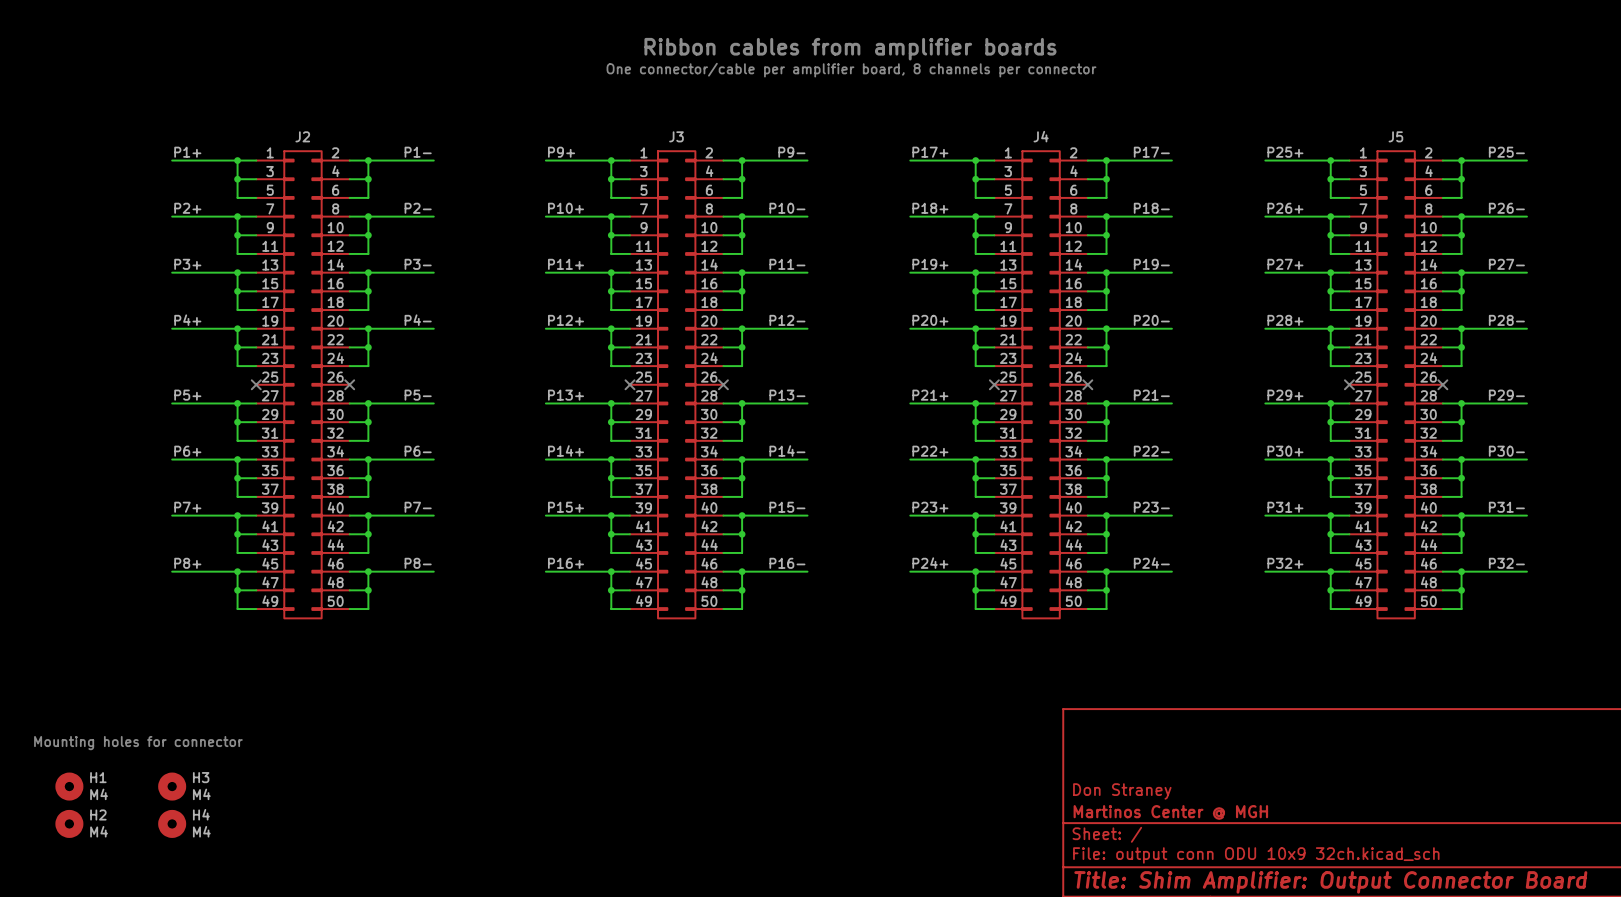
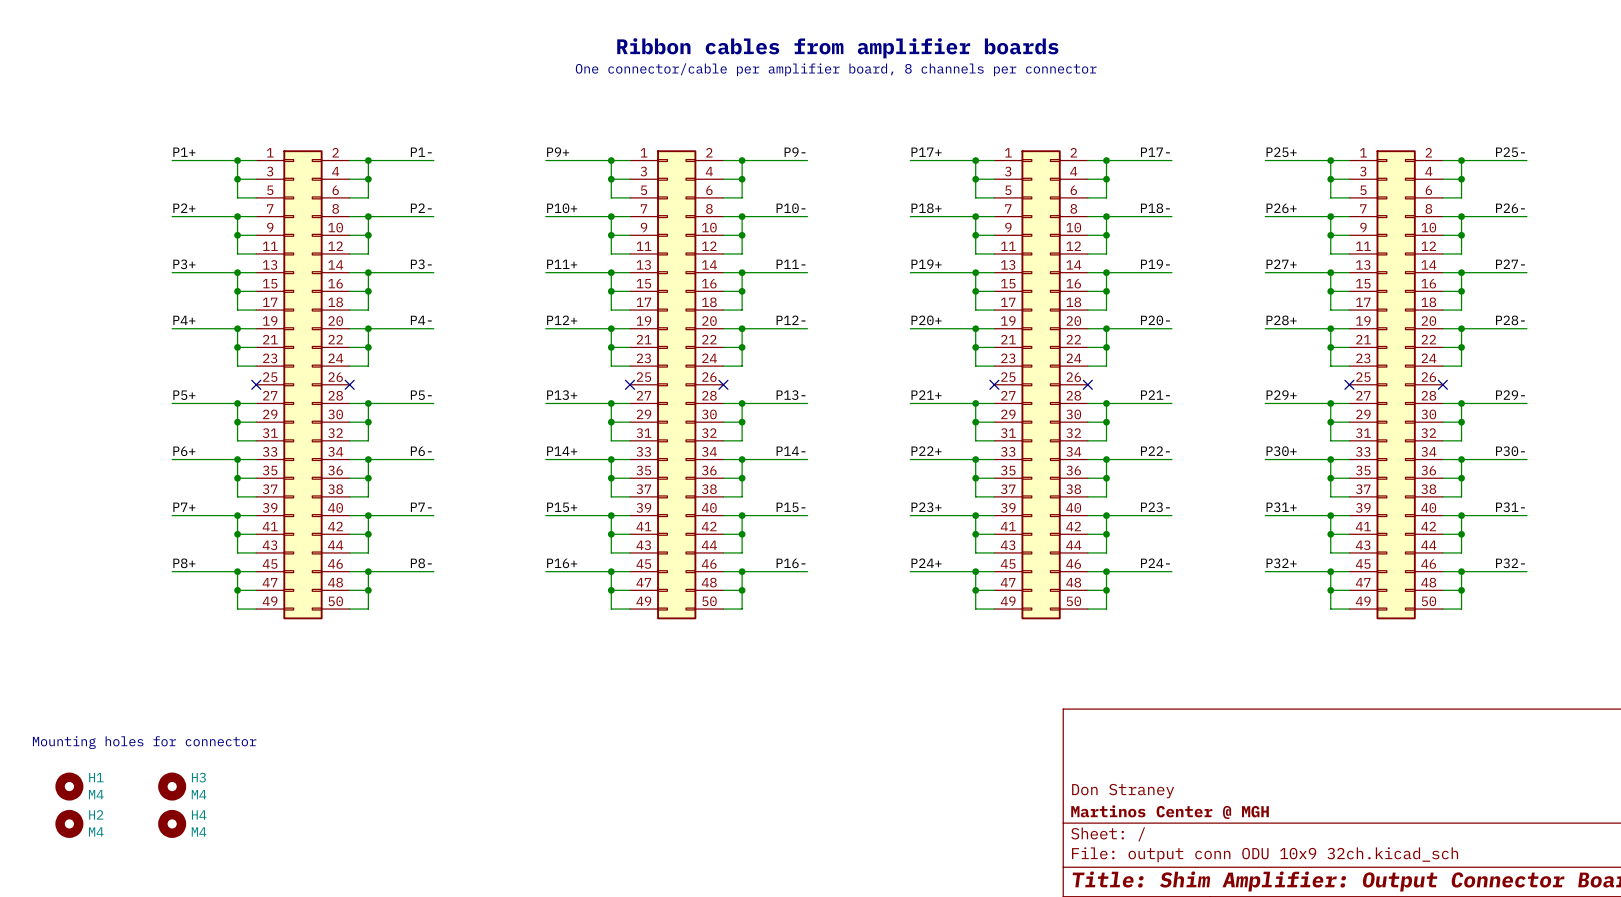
J2 name: J2 (302, 136) -> none
J3 name: J3 (676, 136) -> none
J4 name: J4 (1041, 136) -> none
J5 name: J5 (1395, 136) -> none

